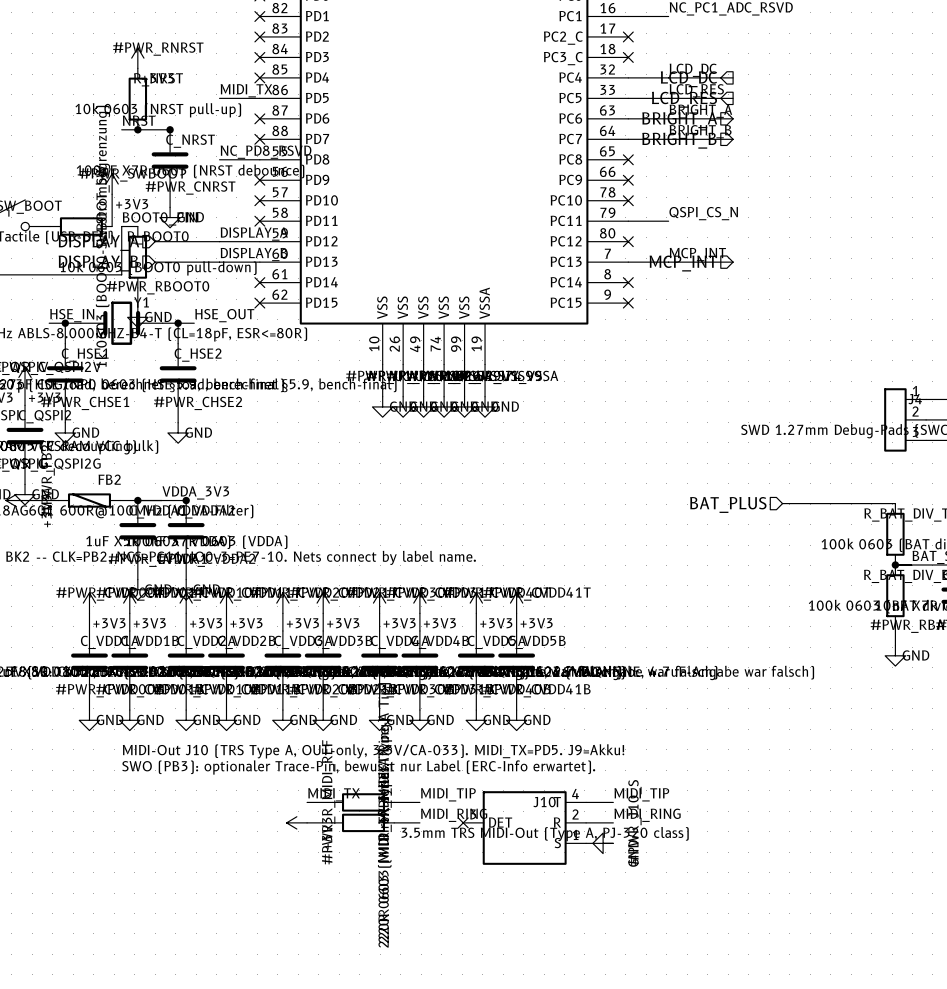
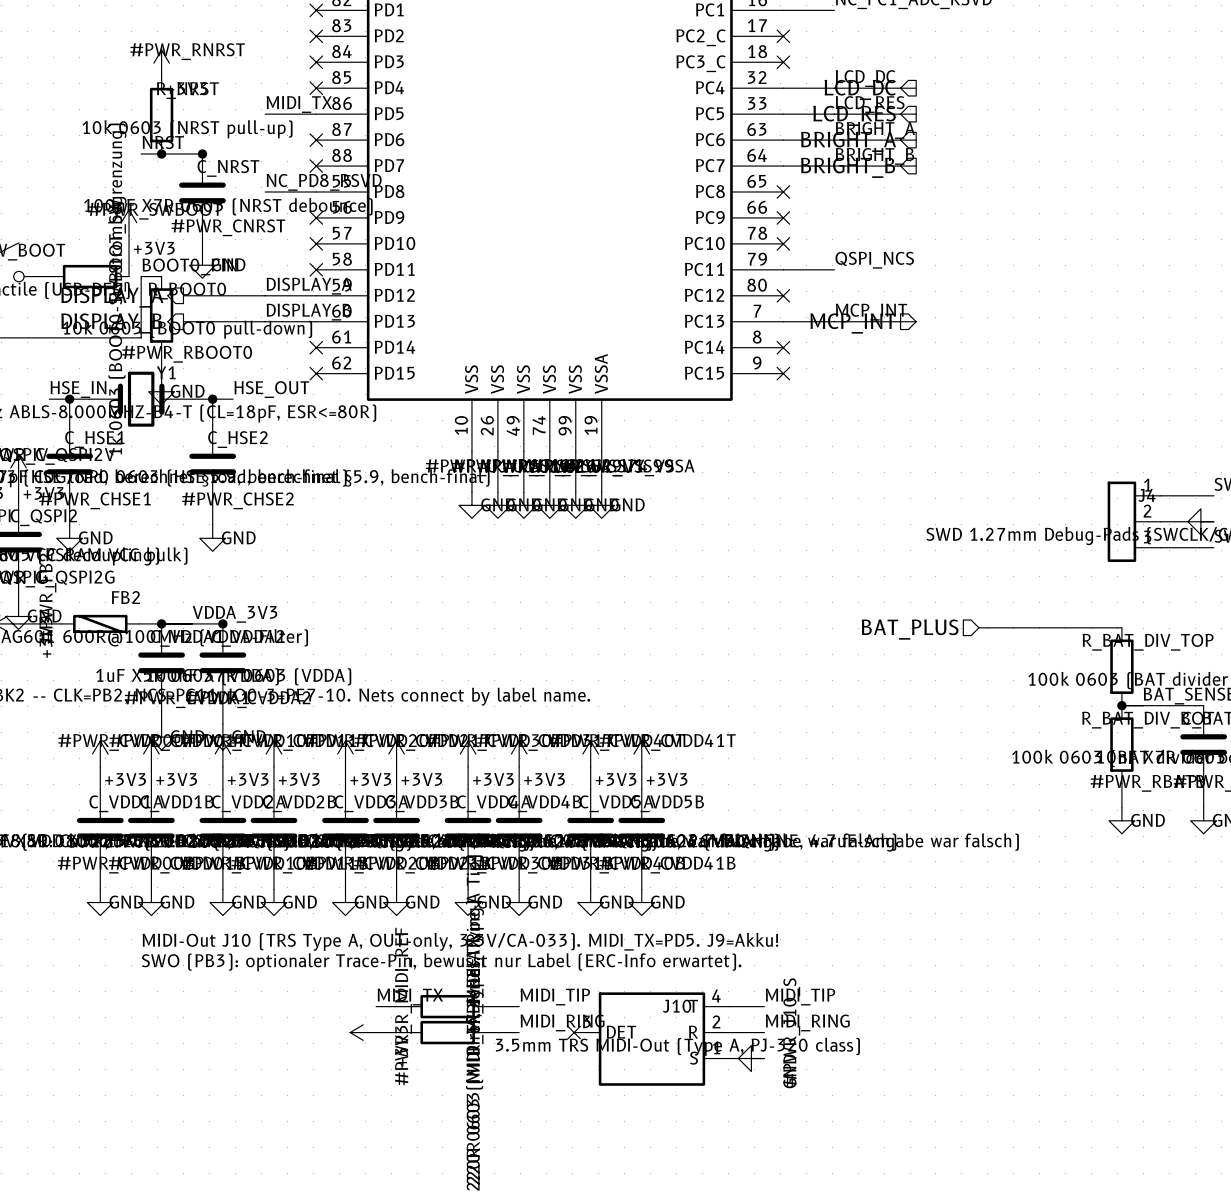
hierarchical label shape: input (679, 120) -> output (848, 141)
hierarchical label shape: input (679, 140) -> output (848, 167)
label: QSPI_CS_N (703, 213) -> QSPI_NCS (874, 260)
hierarchical label shape: input (98, 243) -> output (112, 297)
hierarchical label shape: input (98, 263) -> output (111, 323)

